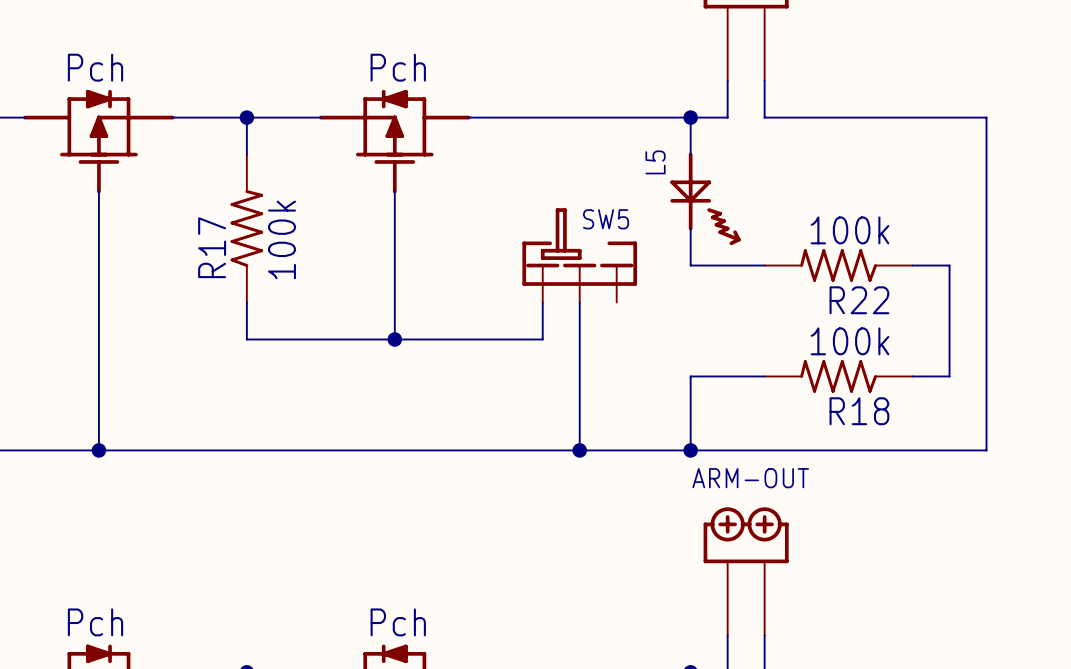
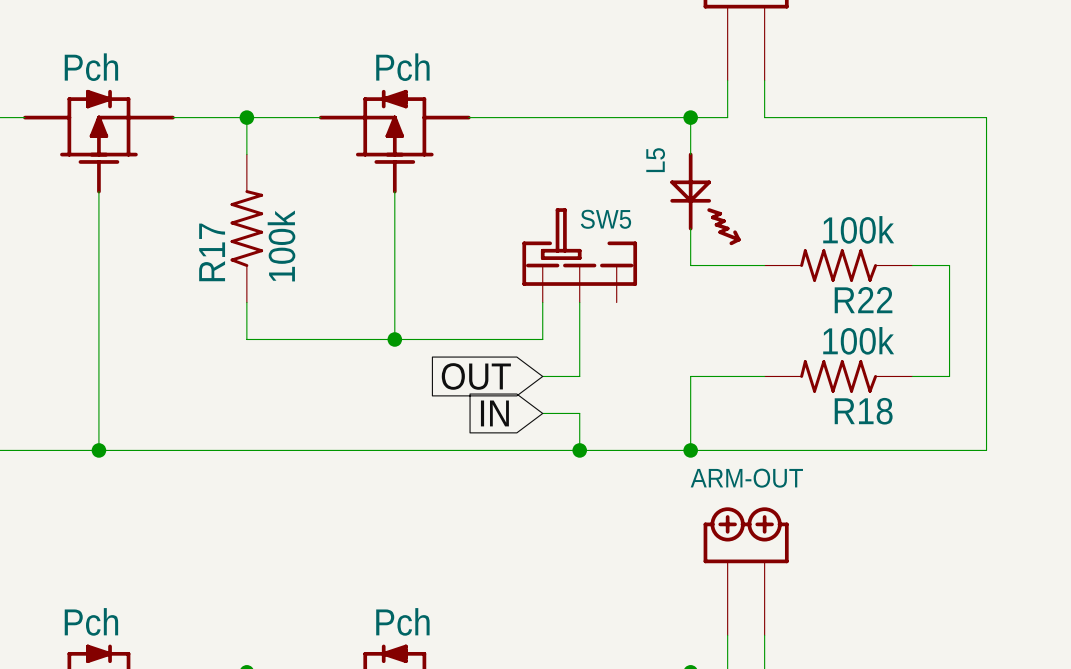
global label: none -> OUT (476, 376)
wire: (579, 376) (579, 413) -> (579, 376) (542, 376)
global label: none -> IN (494, 413)
wire: none -> (542, 413) (579, 413)

